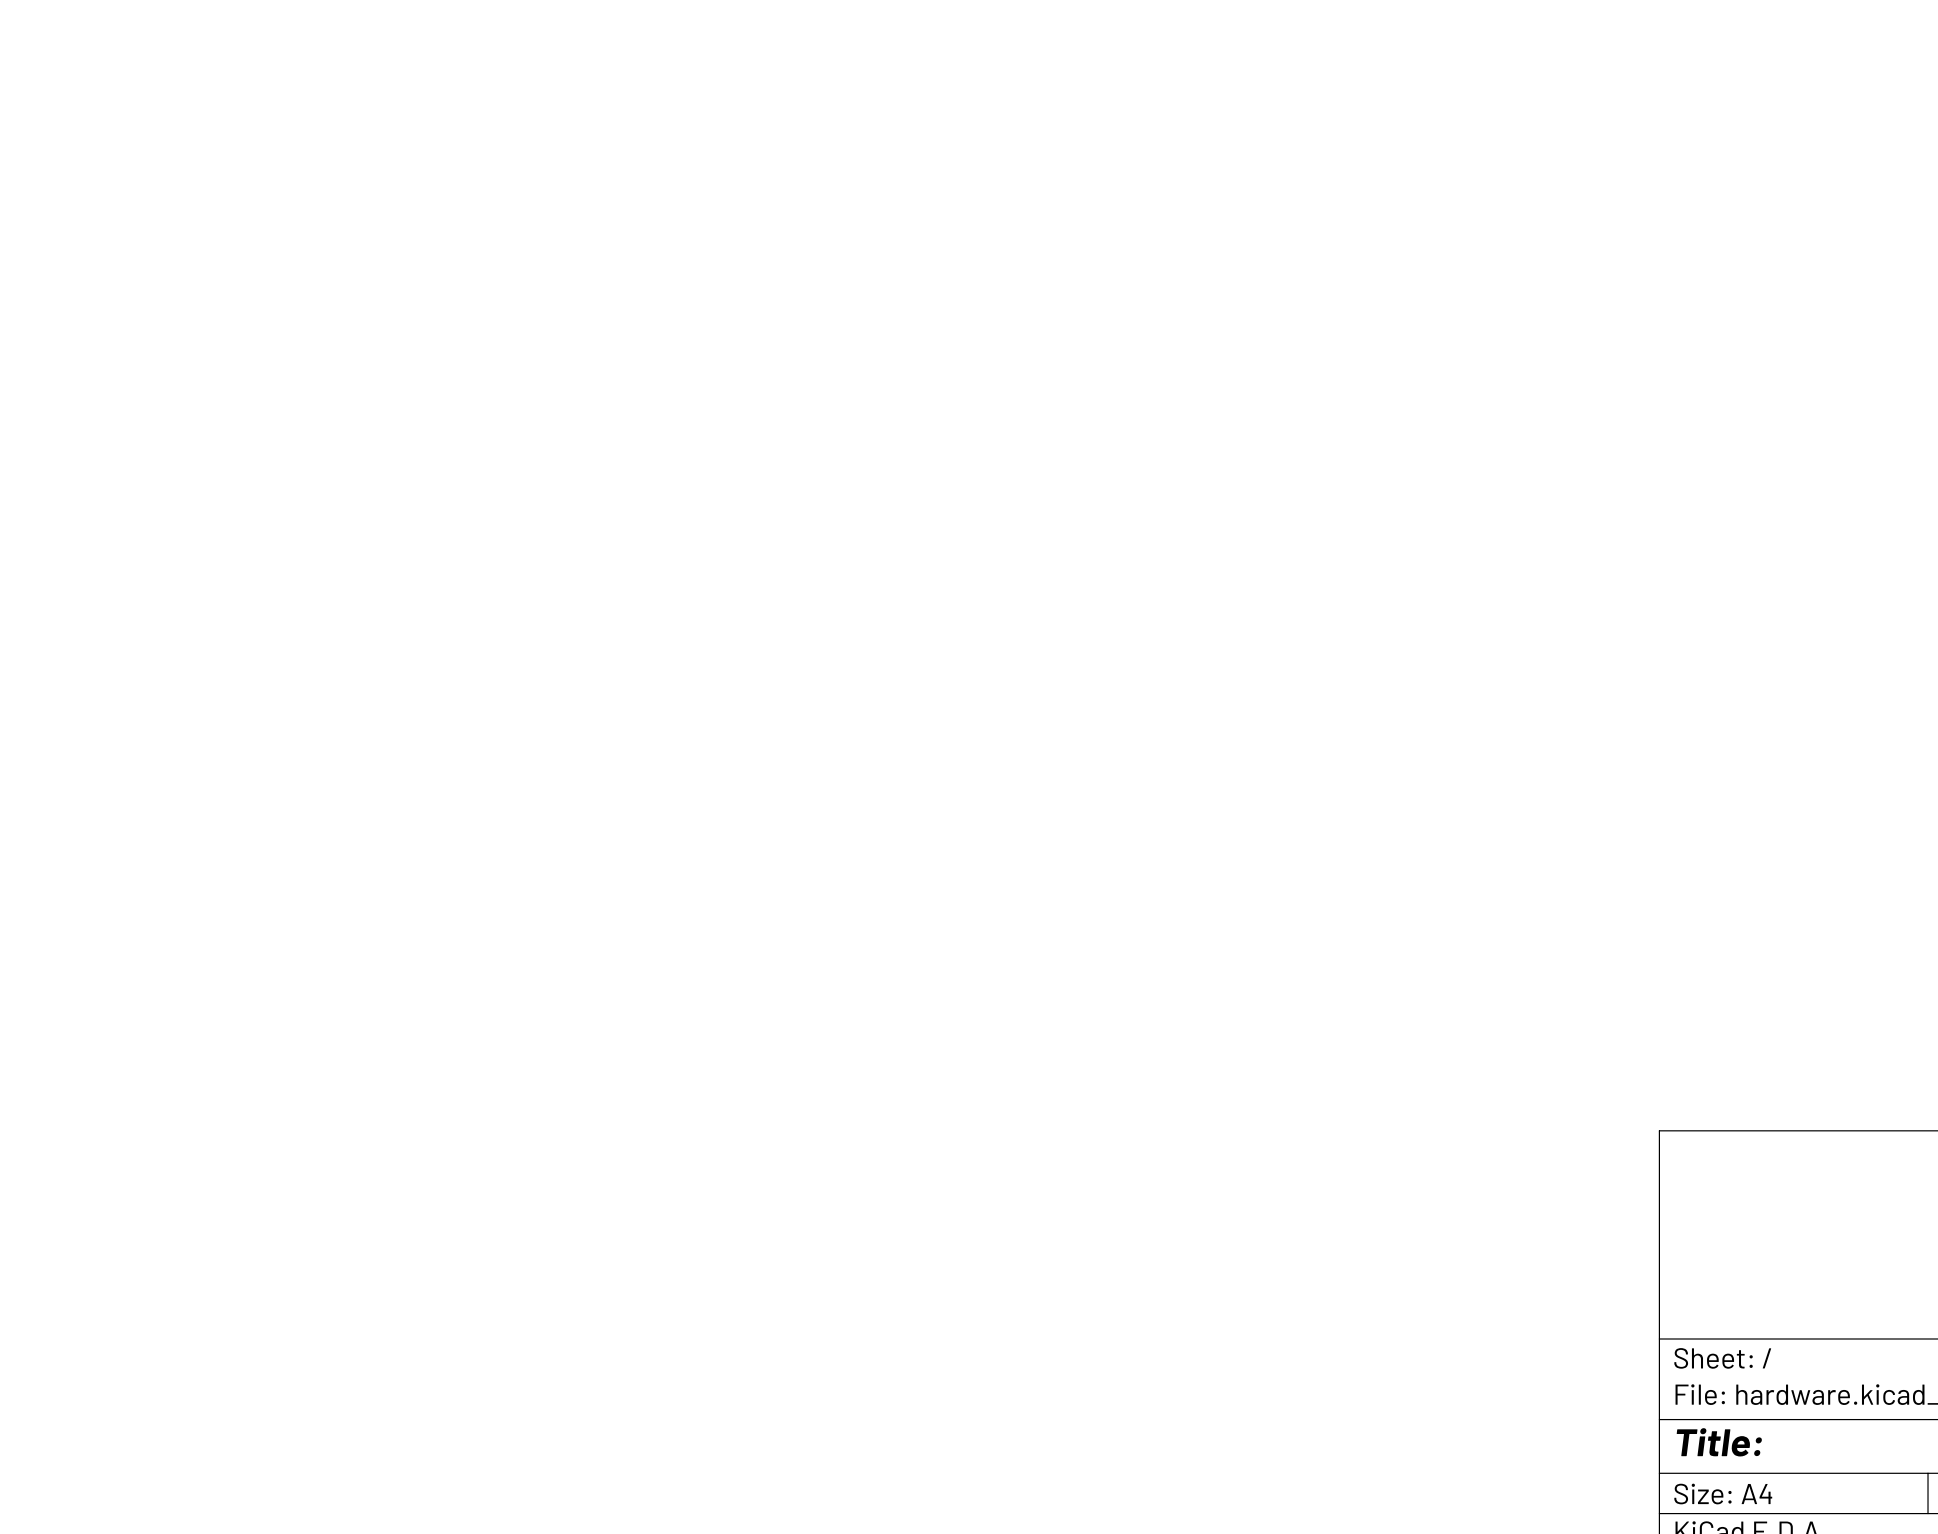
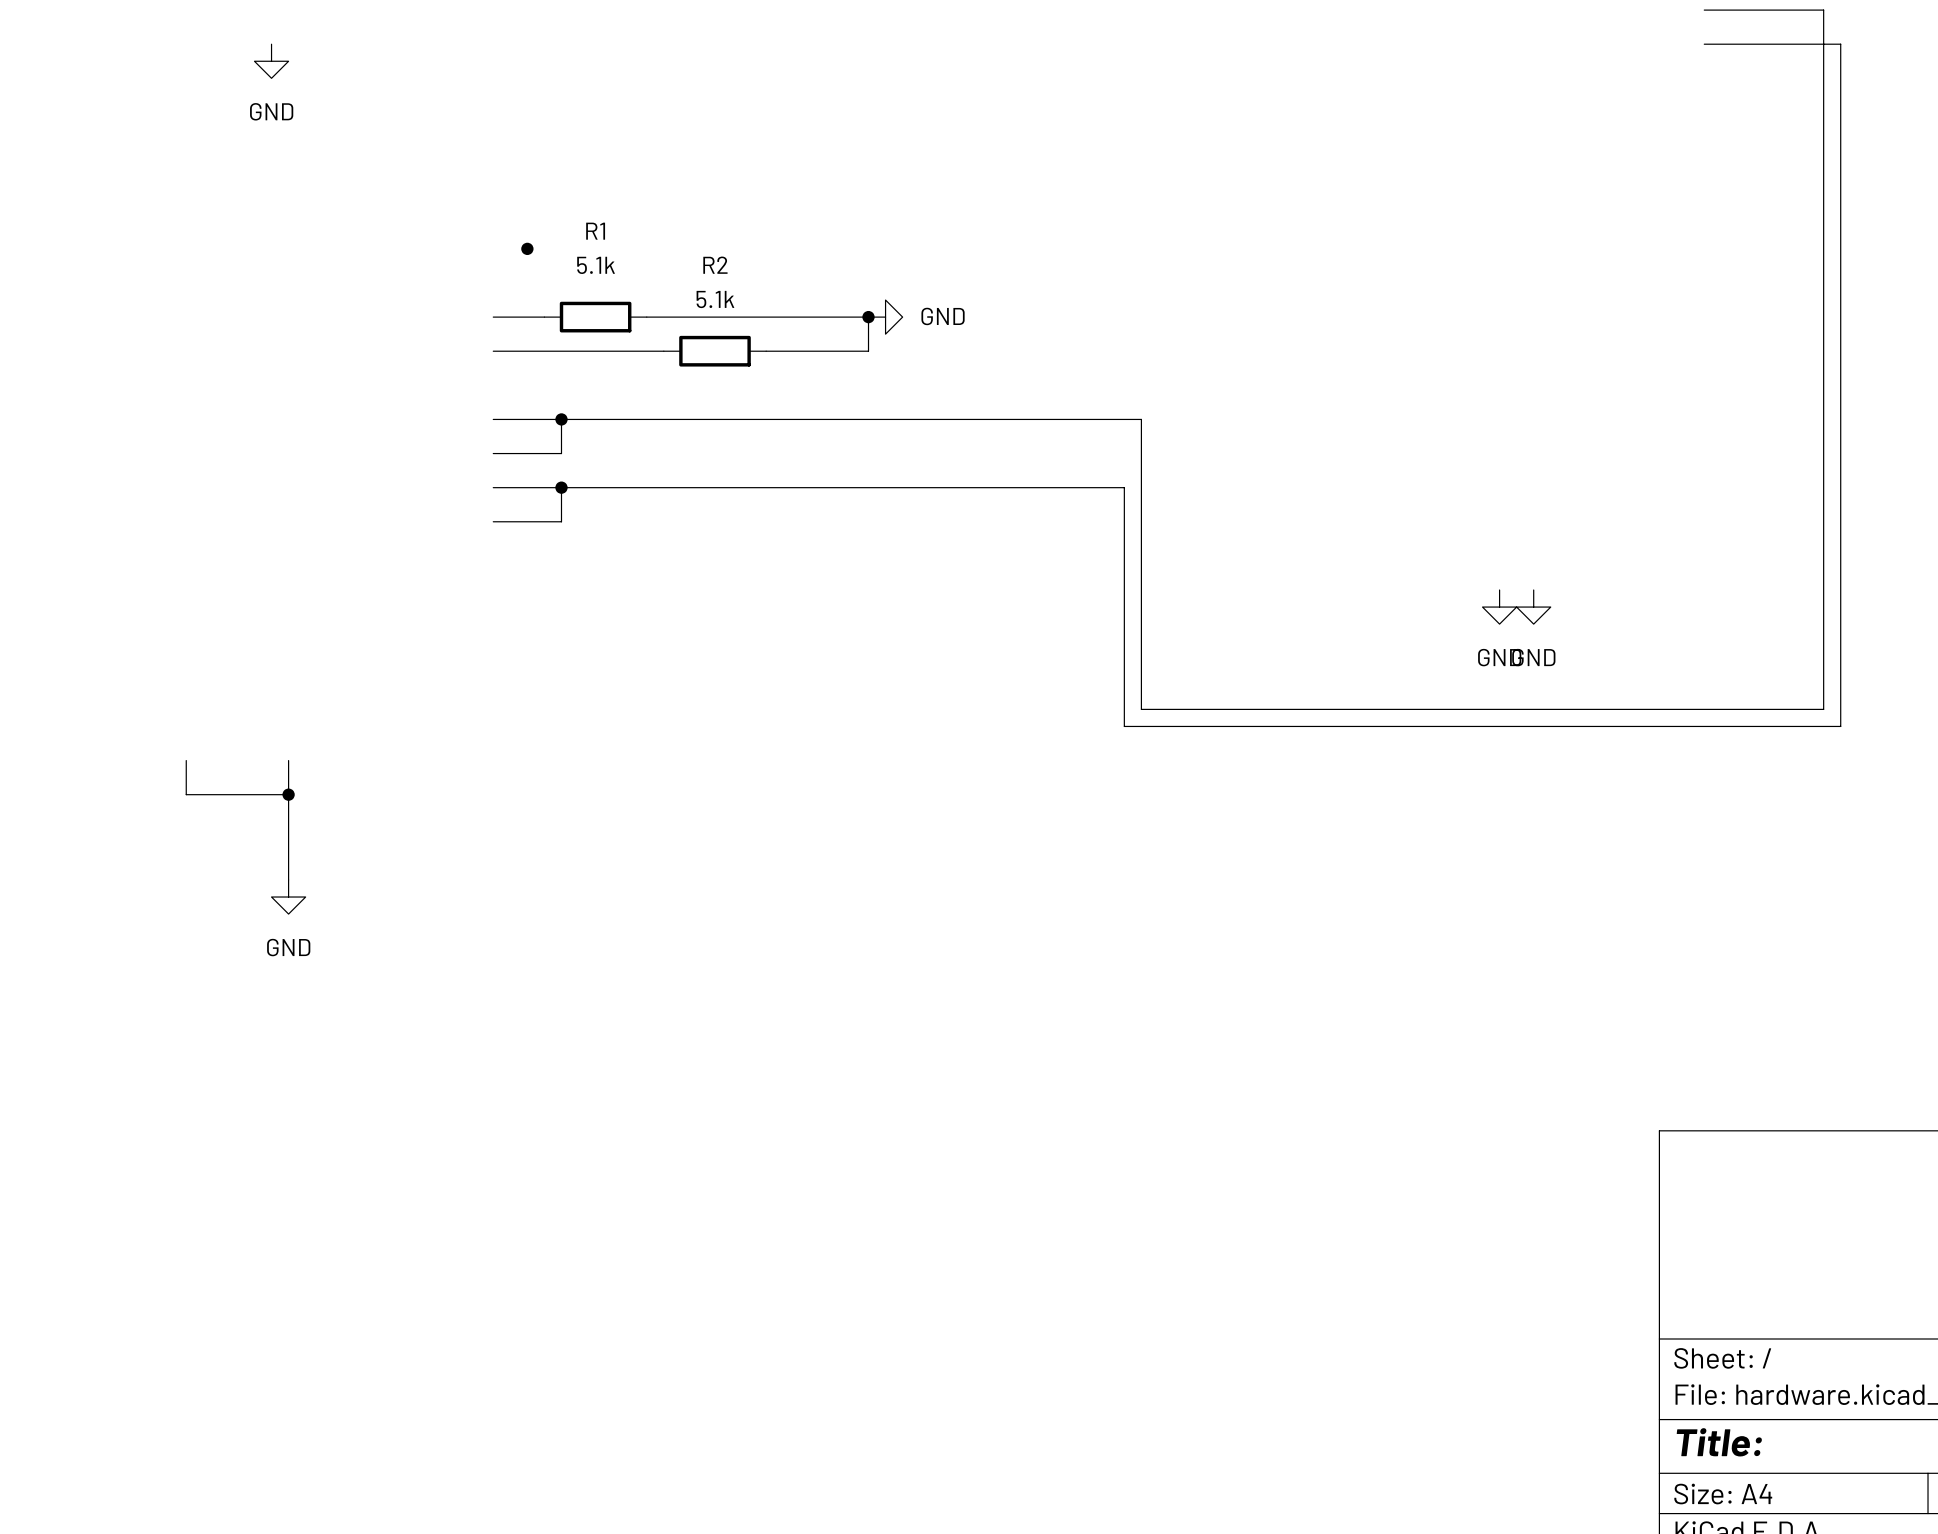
wire: none -> (1704, 10) (1823, 10) (1823, 709) (1141, 709) (1141, 419) (493, 419)
wire: none -> (1704, 44) (1840, 44) (1840, 726) (1124, 726) (1124, 487) (493, 487)
power symbol: none -> GND (271, 61)
junction: none -> (527, 248)
wire: none -> (493, 317) (544, 317)
R1: none -> 5.1k (595, 317)
wire: none -> (646, 317) (868, 317) (868, 351) (766, 351)
junction: none -> (868, 317)
power symbol: none -> GND (885, 317)
wire: none -> (493, 351) (663, 351)
R2: none -> 5.1k (715, 351)
wire: none -> (561, 419) (561, 453) (493, 453)
junction: none -> (561, 419)
wire: none -> (561, 487) (561, 521) (493, 521)
junction: none -> (561, 487)
power symbol: none -> GND (1499, 607)
power symbol: none -> GND (1533, 607)
wire: none -> (186, 760) (186, 794) (288, 794)
wire: none -> (288, 760) (288, 879)
junction: none -> (288, 794)
power symbol: none -> GND (288, 897)

